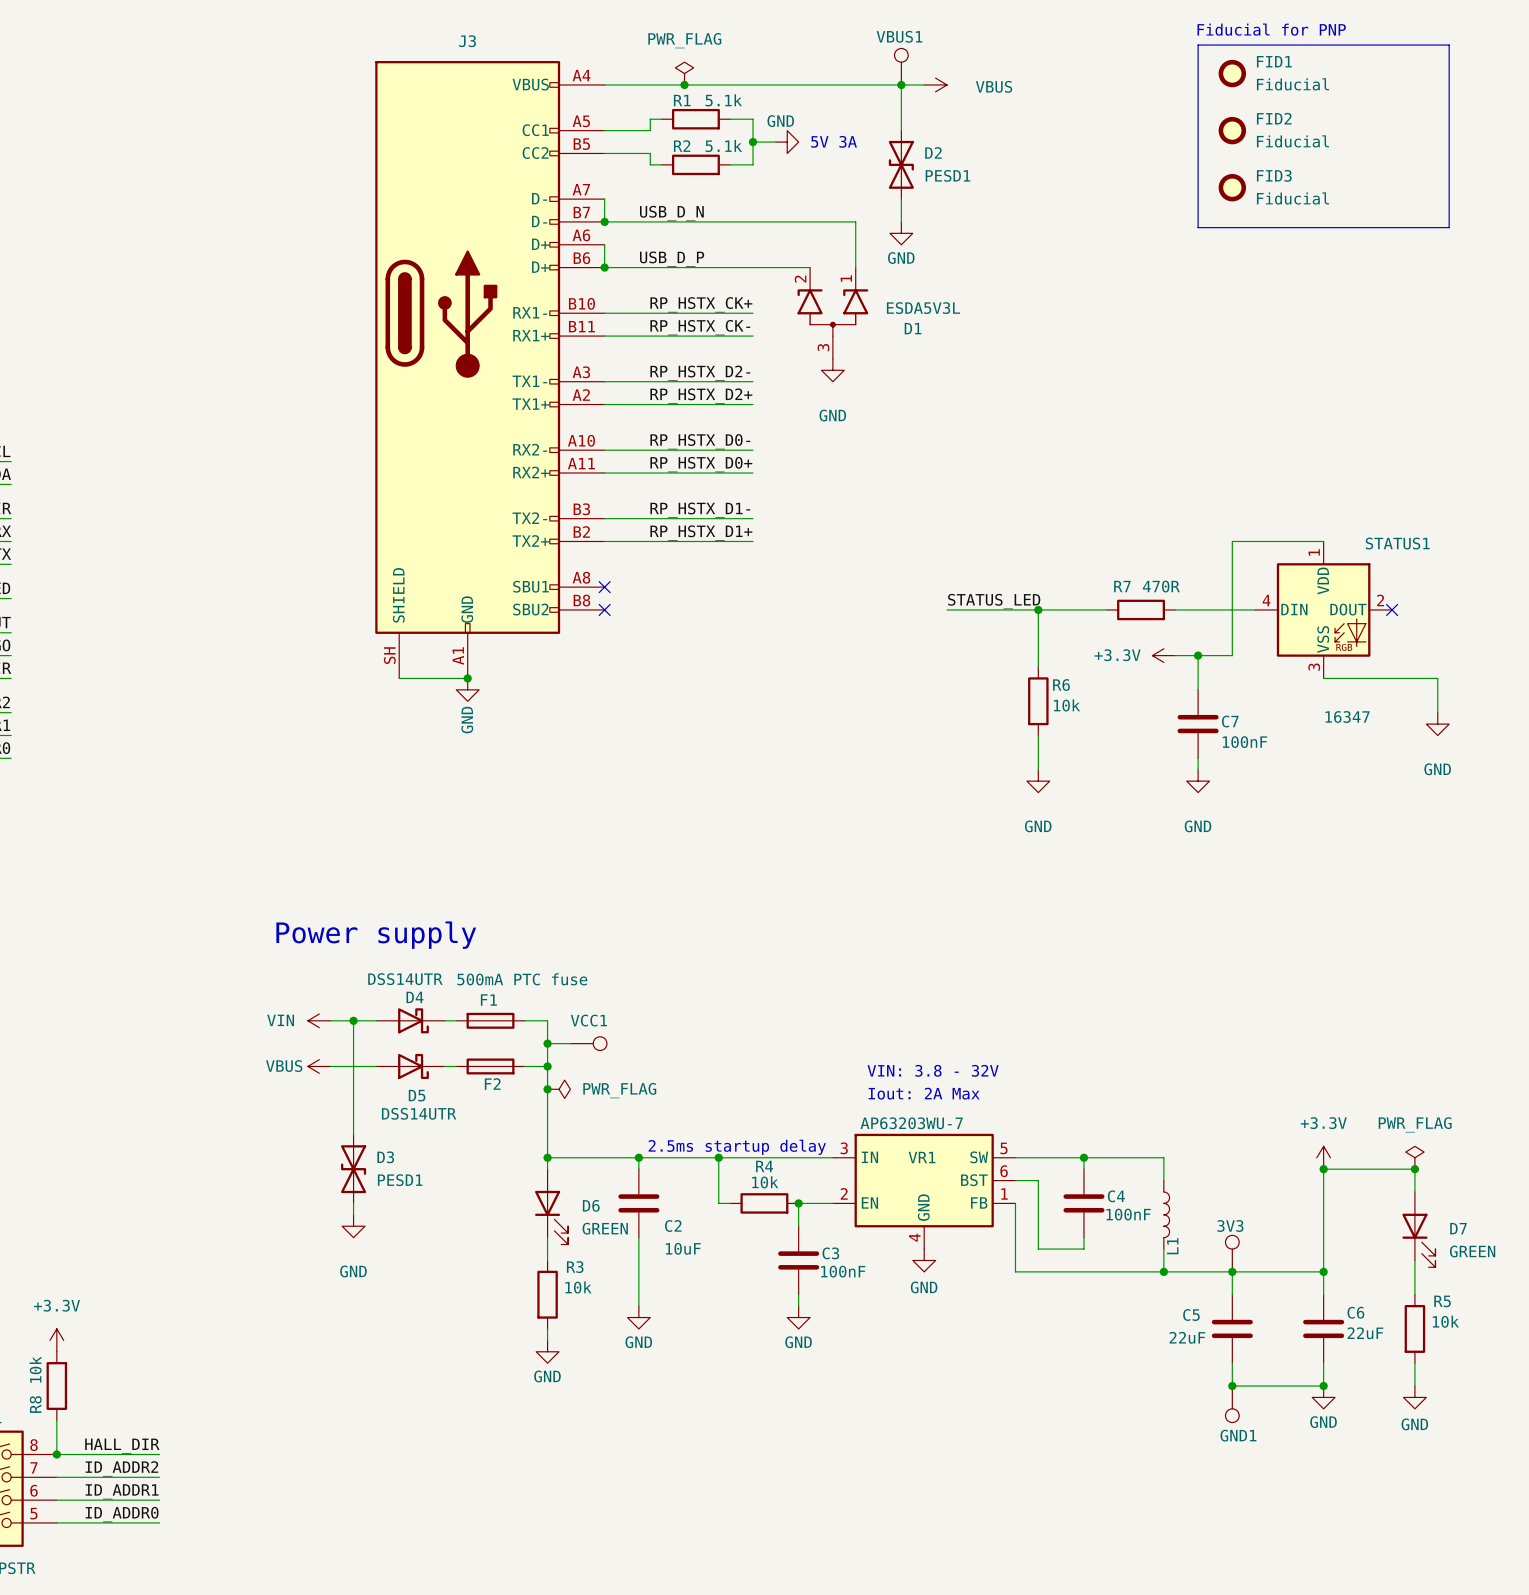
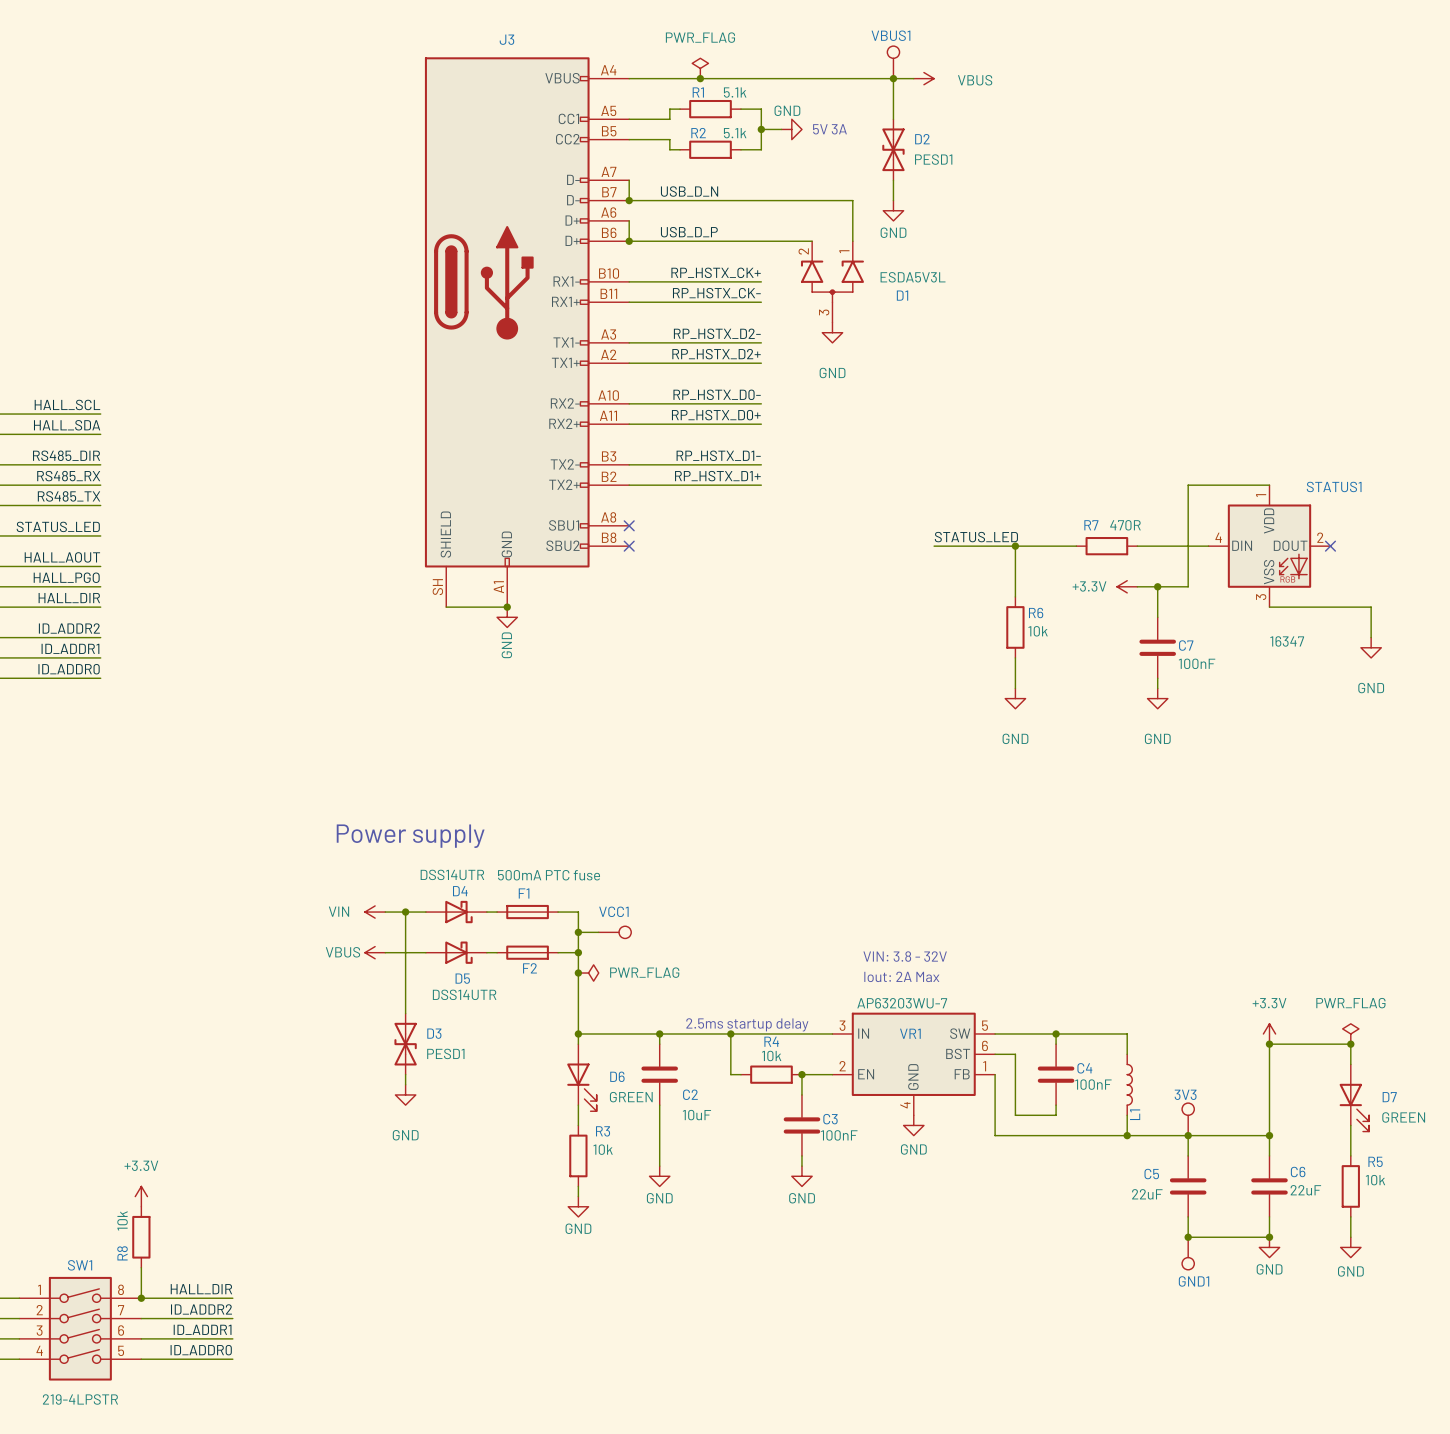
text: Fiducial for PNP (1271, 29) -> none
line: (1198, 45) (1449, 45) (1449, 227) (1198, 227) (1198, 45) -> none
FID1: Fiducial (1232, 73) -> none
FID2: Fiducial (1232, 130) -> none
FID3: Fiducial (1232, 187) -> none

